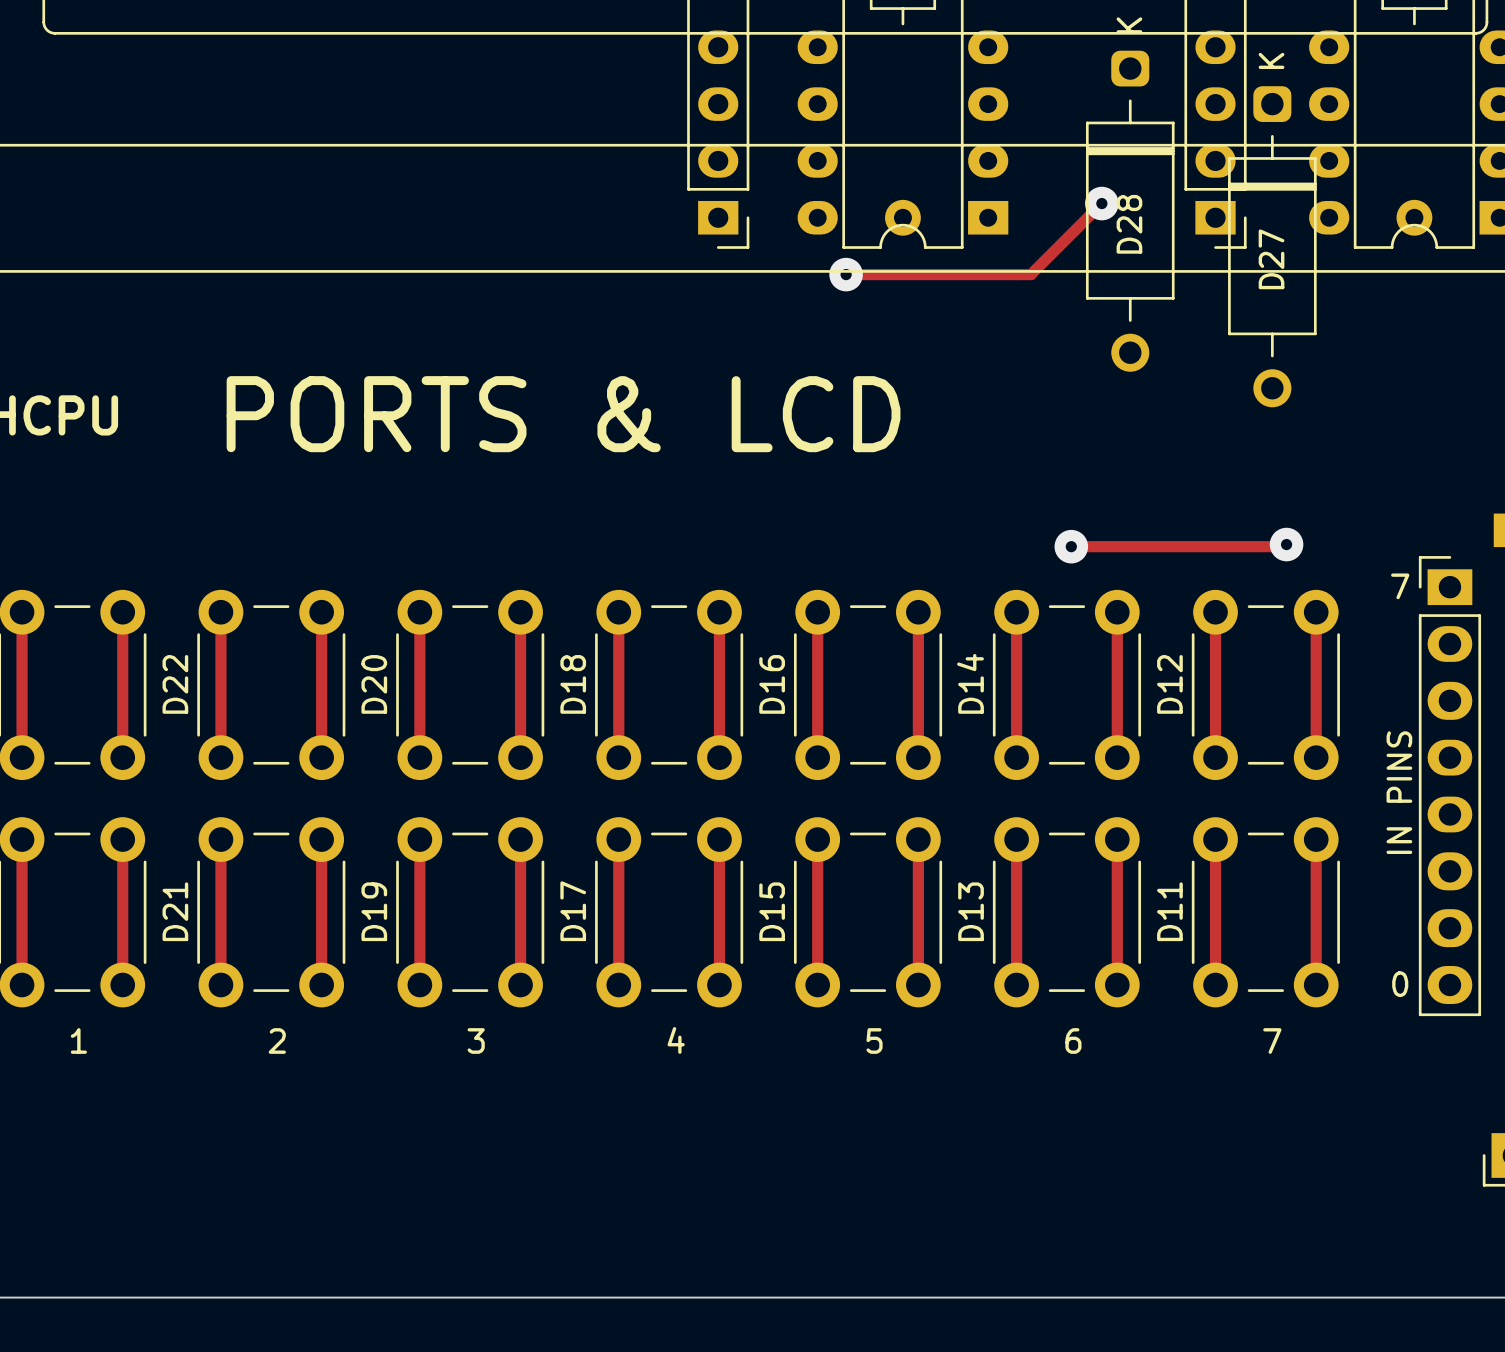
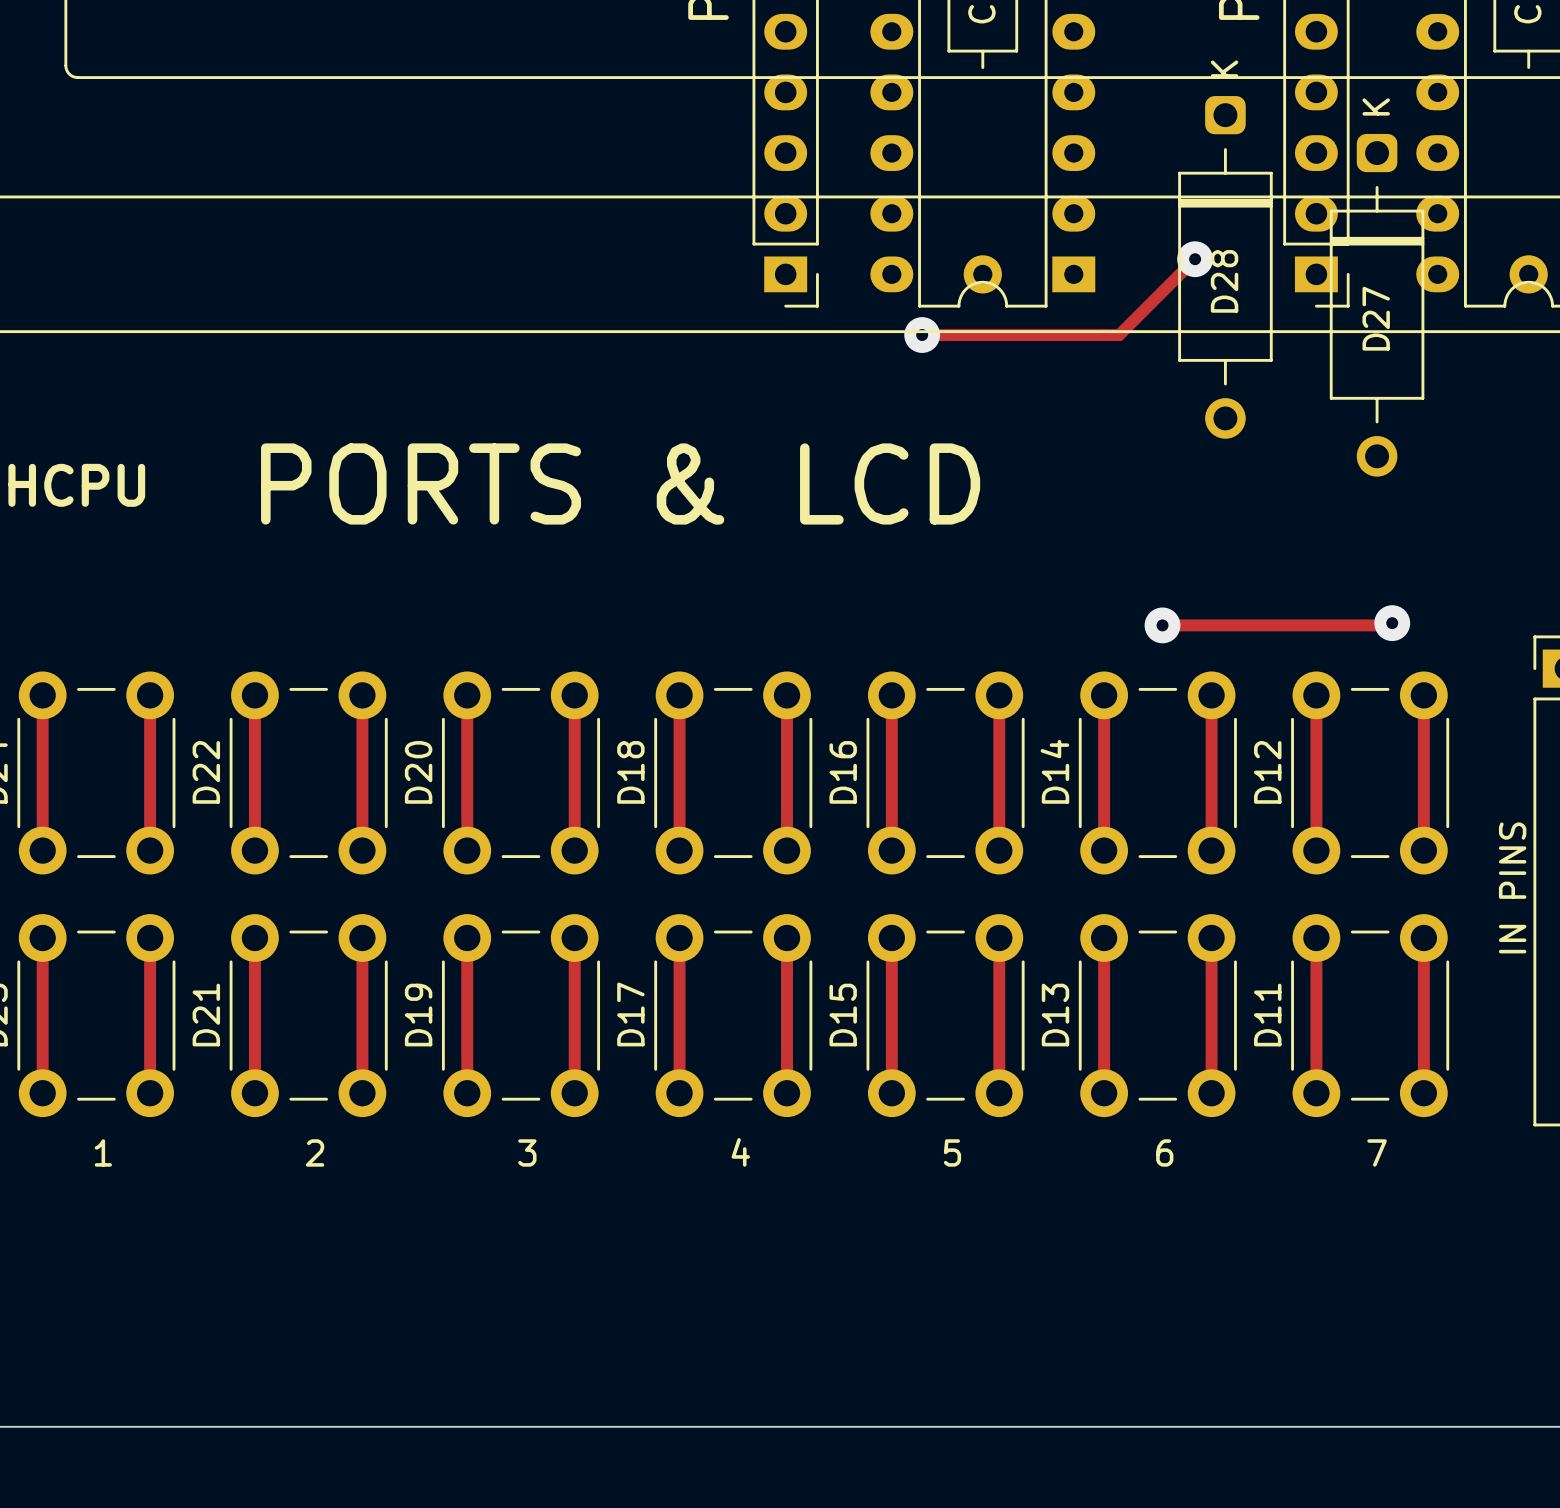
text: 7 (1400, 586) -> none
text: 0 (1400, 984) -> none

